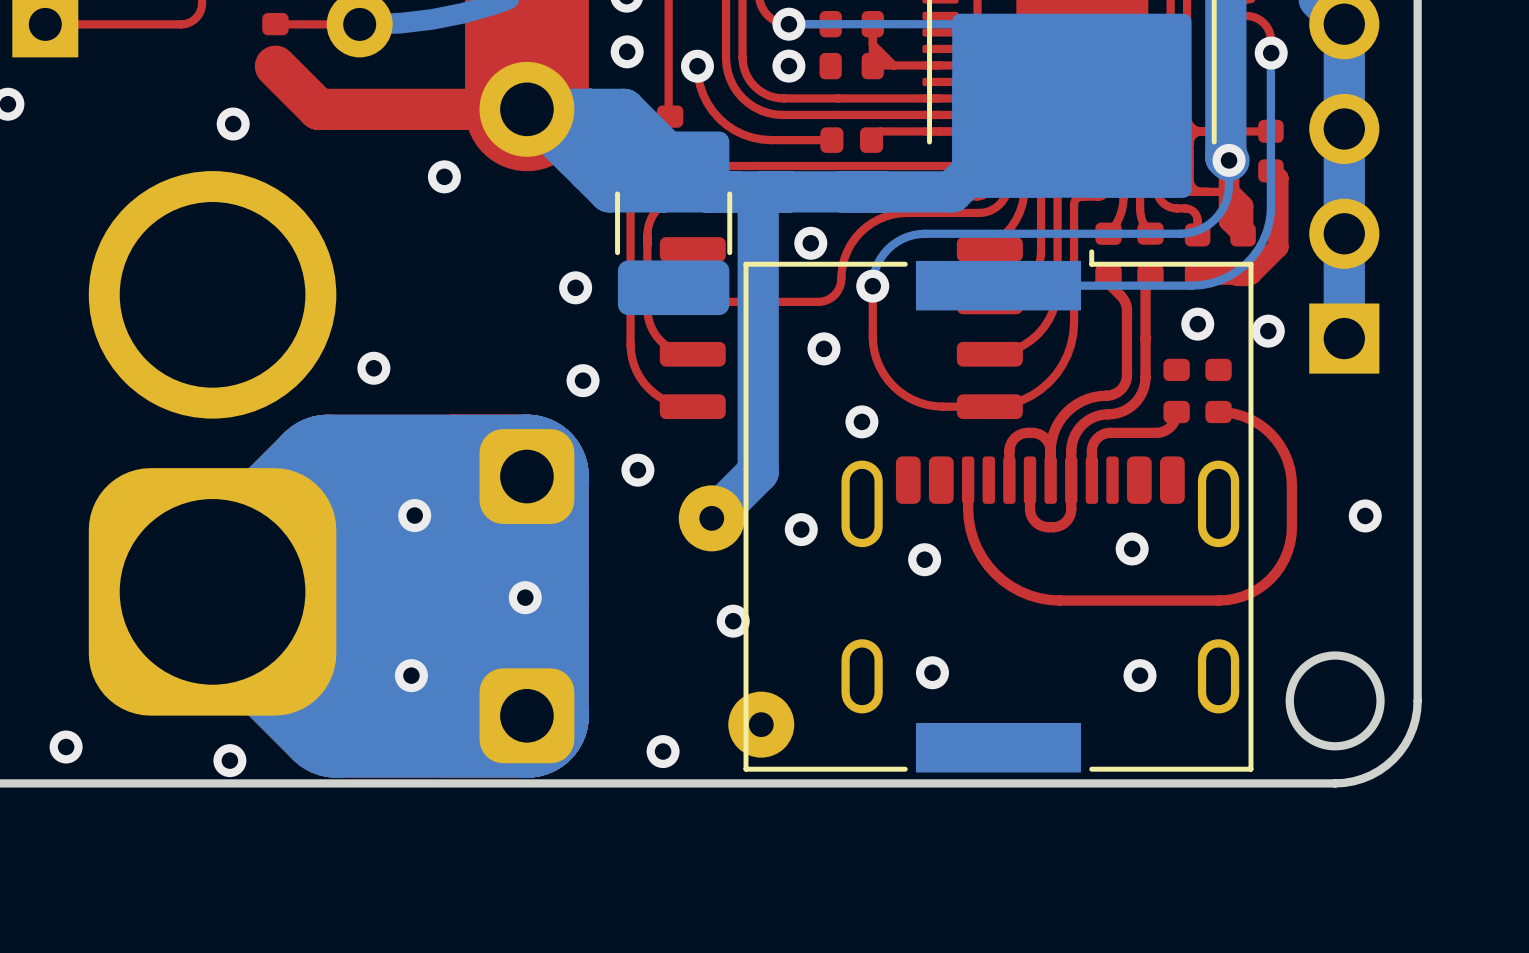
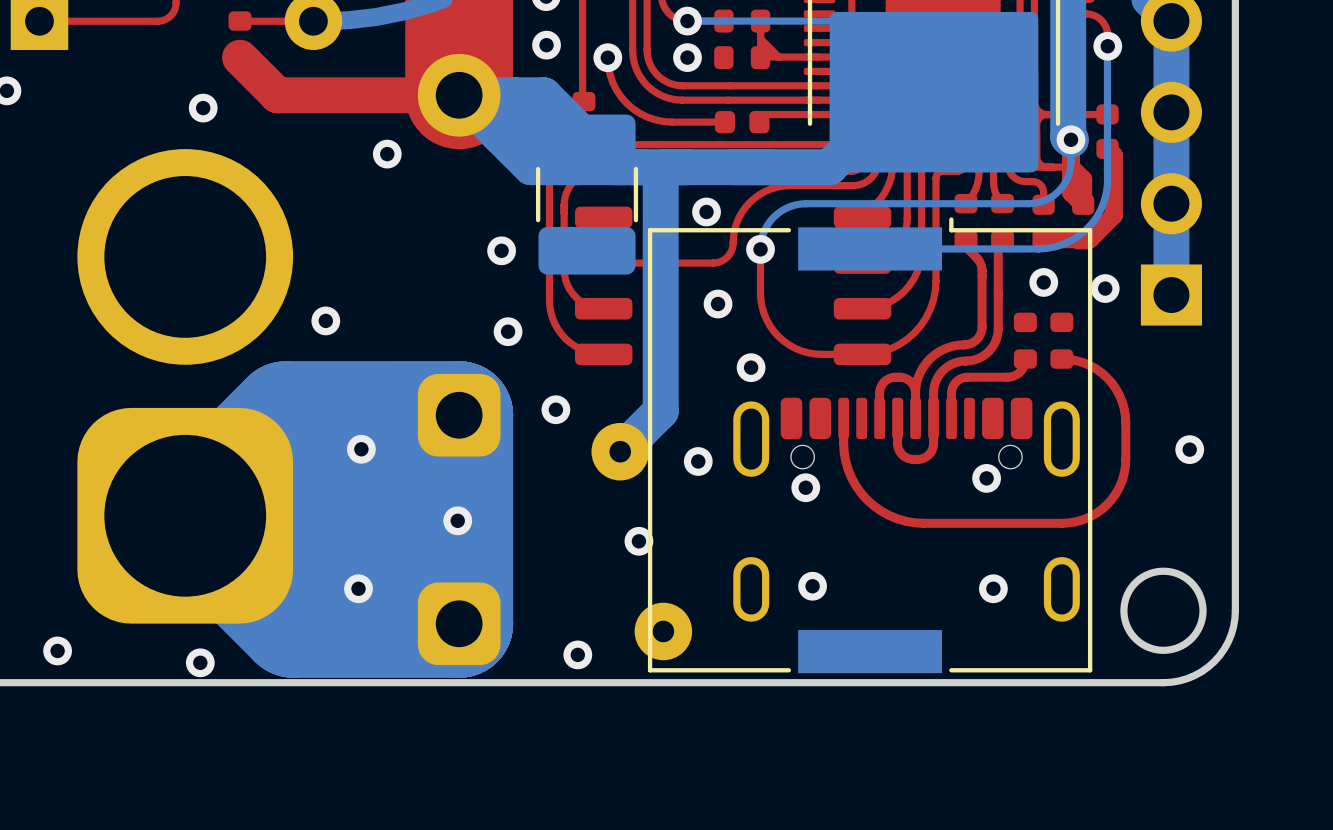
part footprint: [841, 456, 1240, 714] -> [733, 397, 1080, 622]

